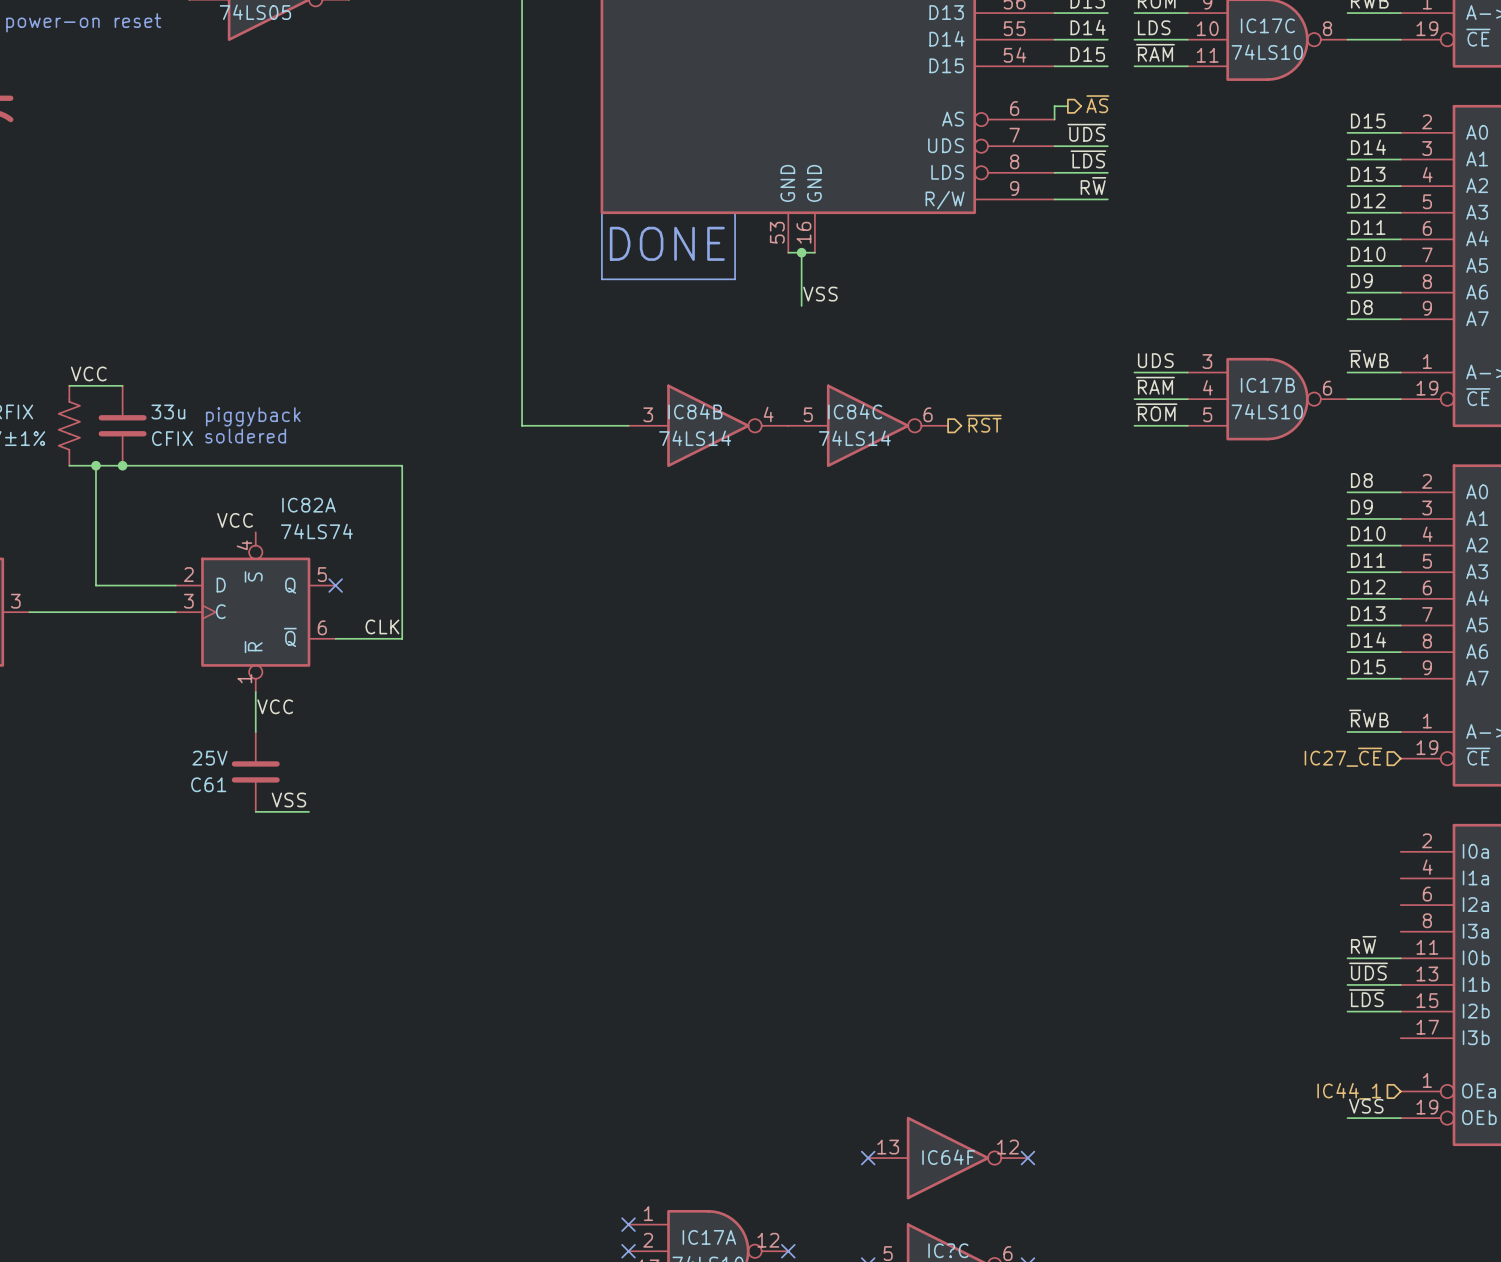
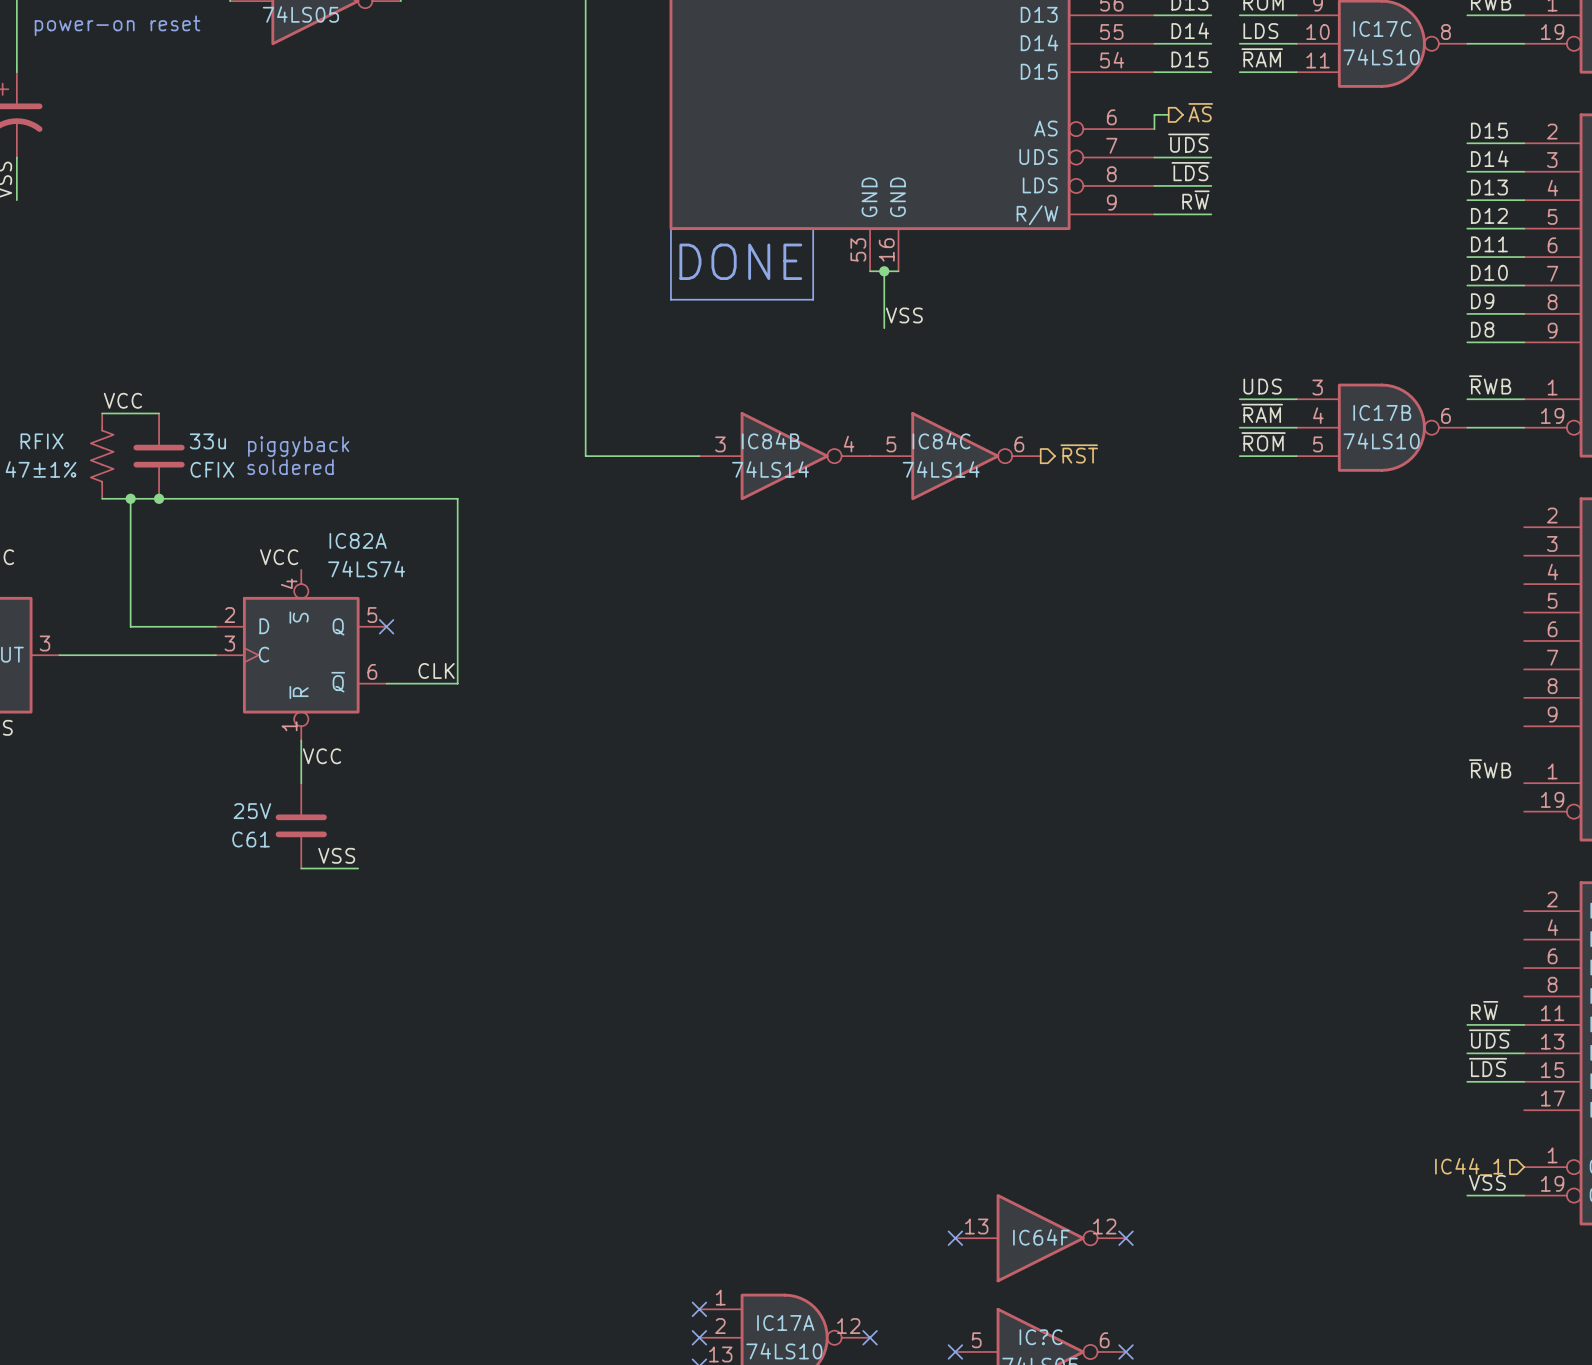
label: D8 (1361, 480) -> none
wire: (1347, 492) (1400, 492) -> none
label: D9 (1361, 507) -> none
wire: (1347, 518) (1400, 518) -> none
label: D10 (1368, 533) -> none
wire: (1347, 545) (1400, 545) -> none
label: D11 (1368, 560) -> none
wire: (1347, 572) (1400, 572) -> none
label: D12 (1368, 586) -> none
wire: (1347, 598) (1400, 598) -> none
label: D13 (1368, 613) -> none
wire: (1347, 625) (1400, 625) -> none
label: D14 (1368, 639) -> none
wire: (1347, 652) (1400, 652) -> none
label: D15 (1368, 666) -> none
wire: (1347, 678) (1400, 678) -> none
wire: (1347, 732) (1400, 732) -> none
hierarchical label: IC27_~{CE} (1343, 757) -> none

